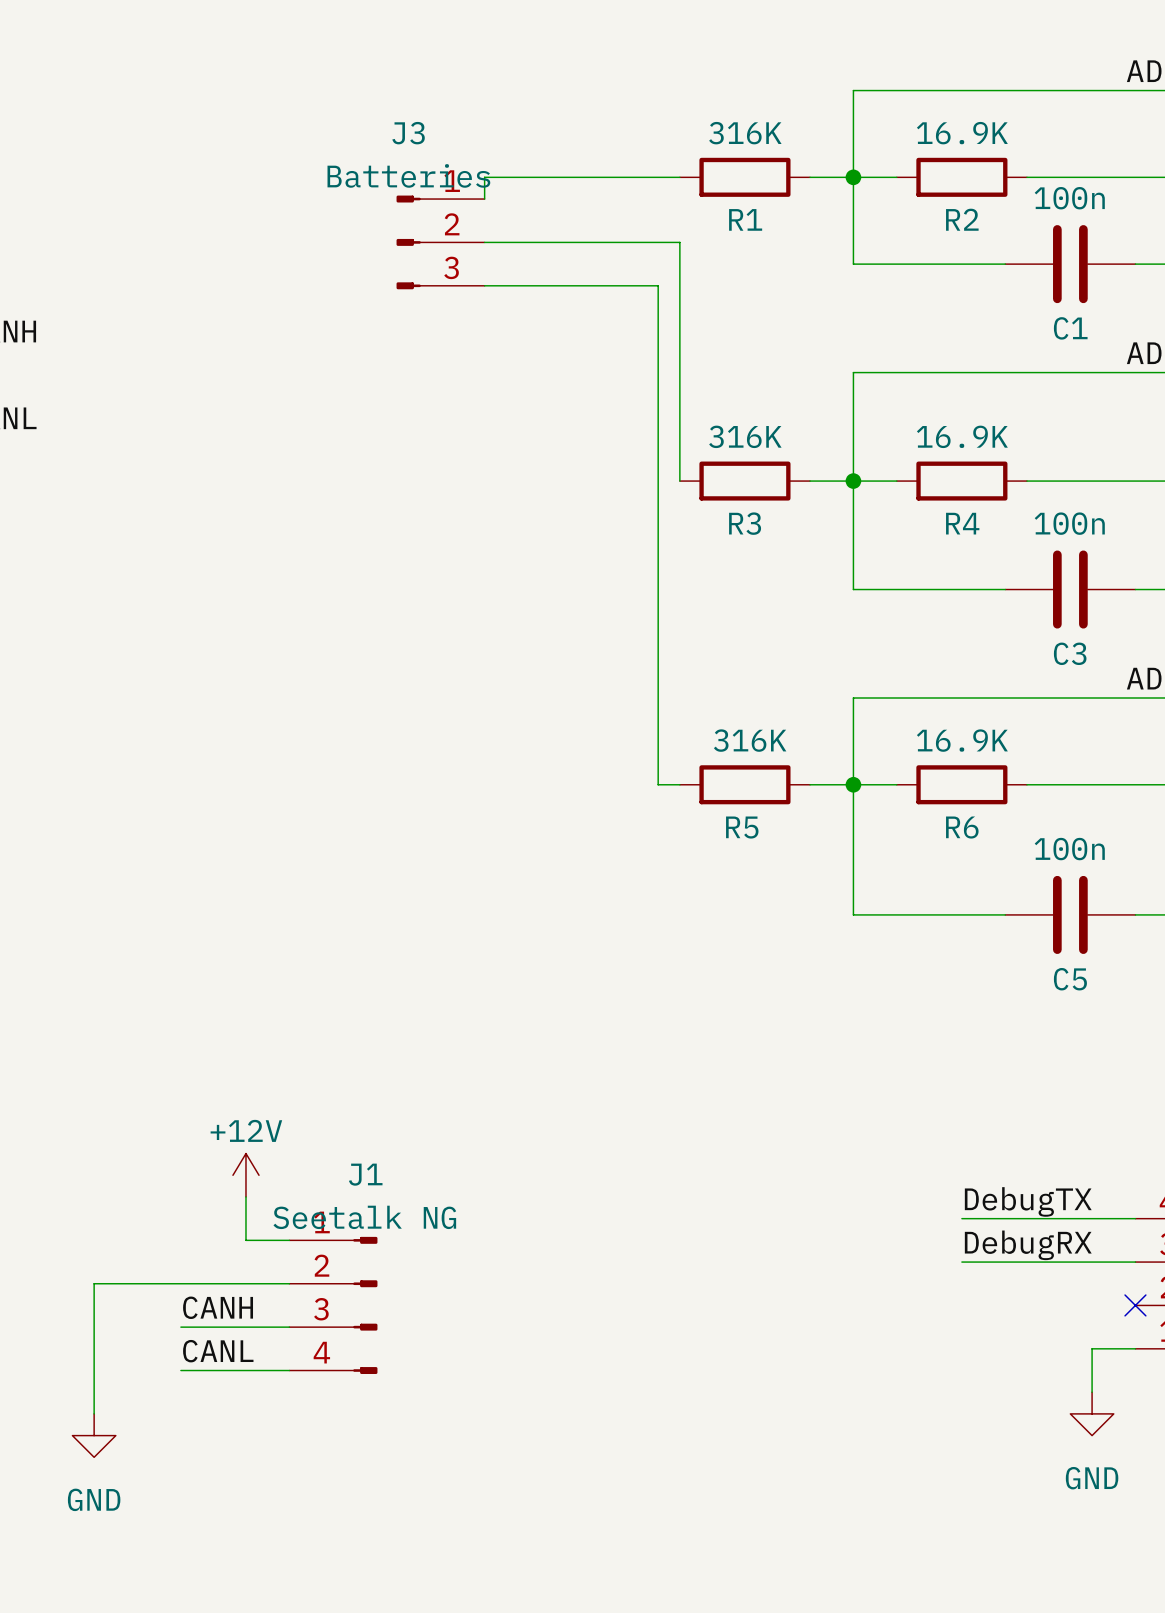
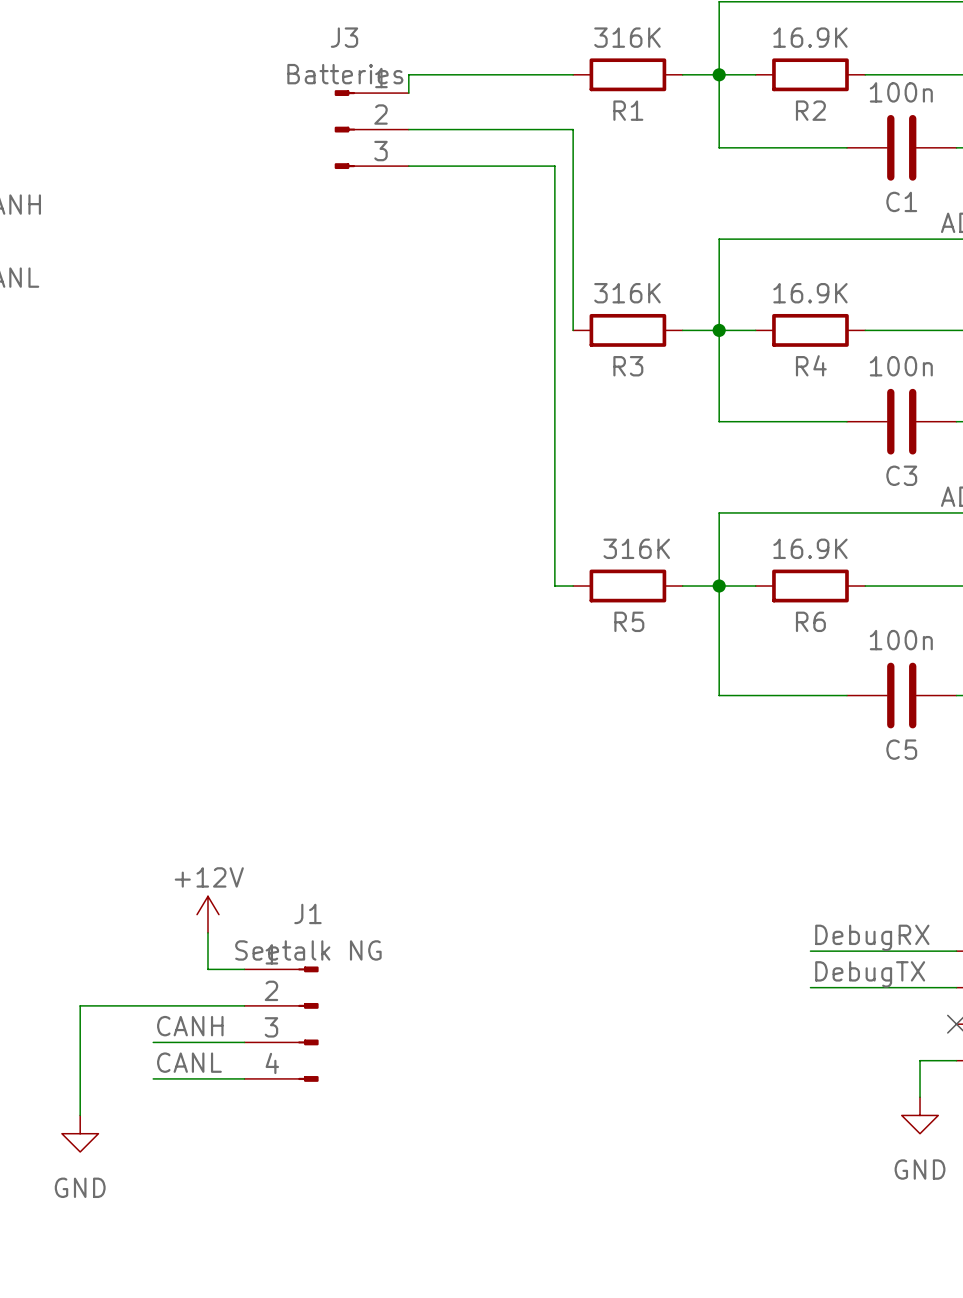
label: DebugTX (1028, 1201) -> DebugRX (872, 937)
label: DebugRX (1028, 1245) -> DebugTX (870, 974)

